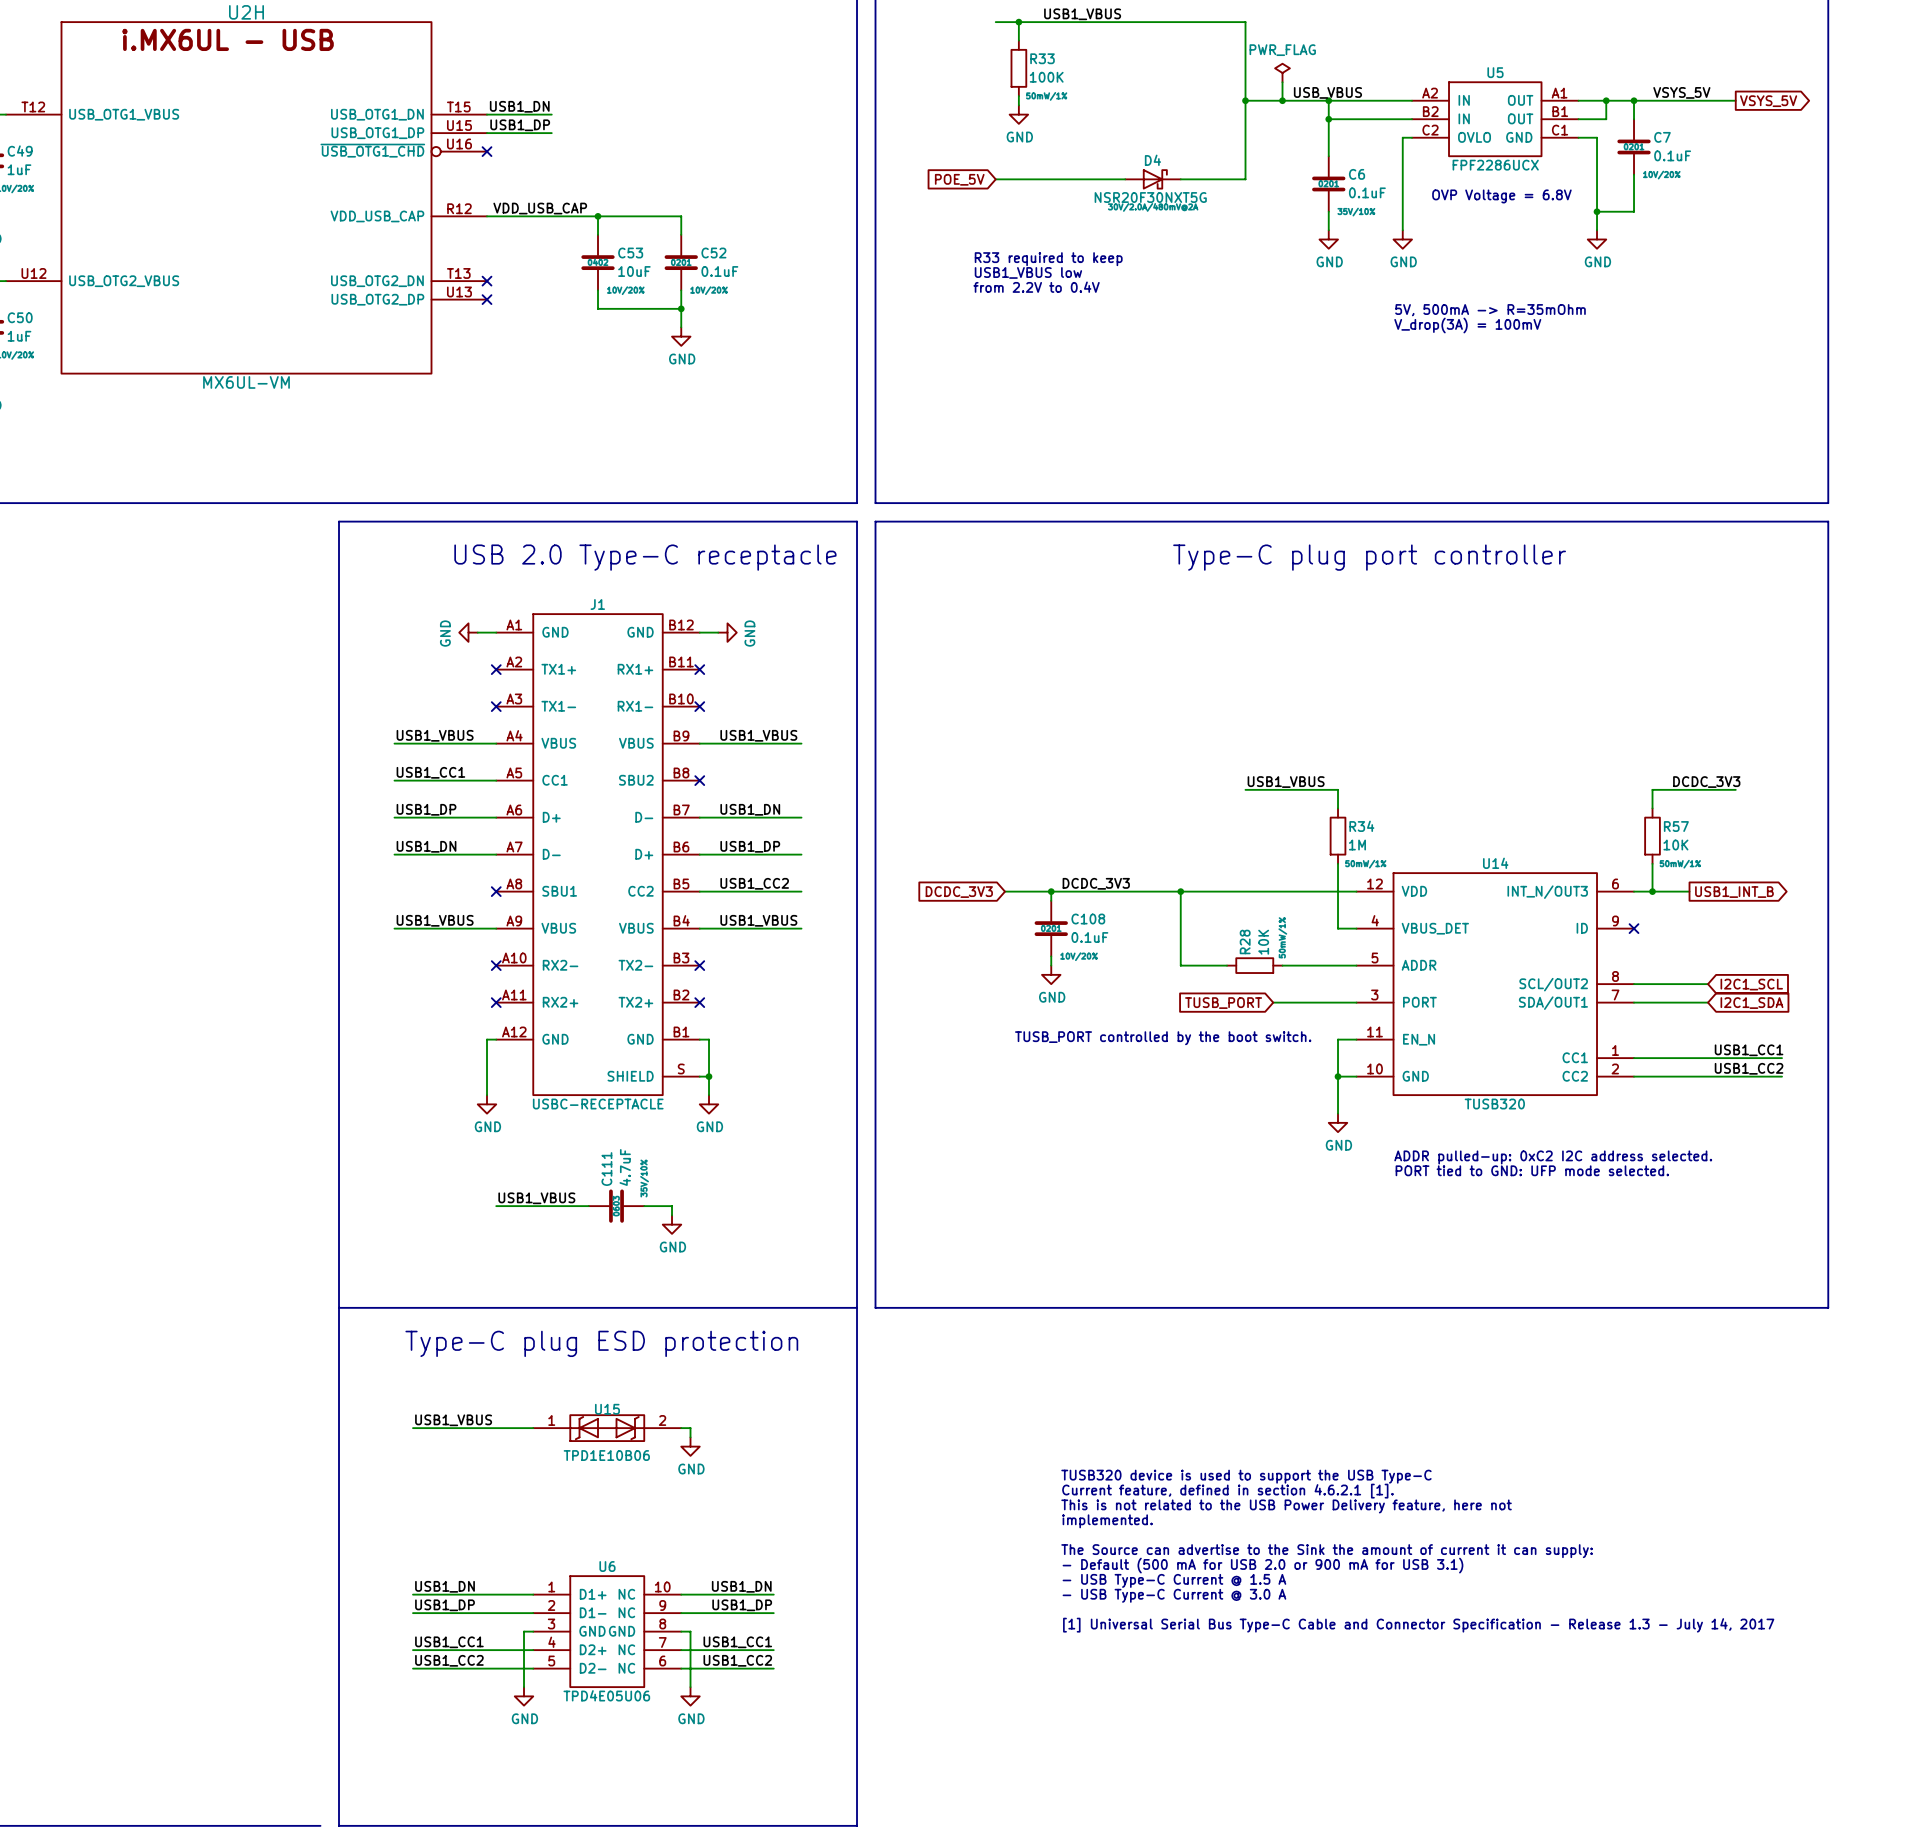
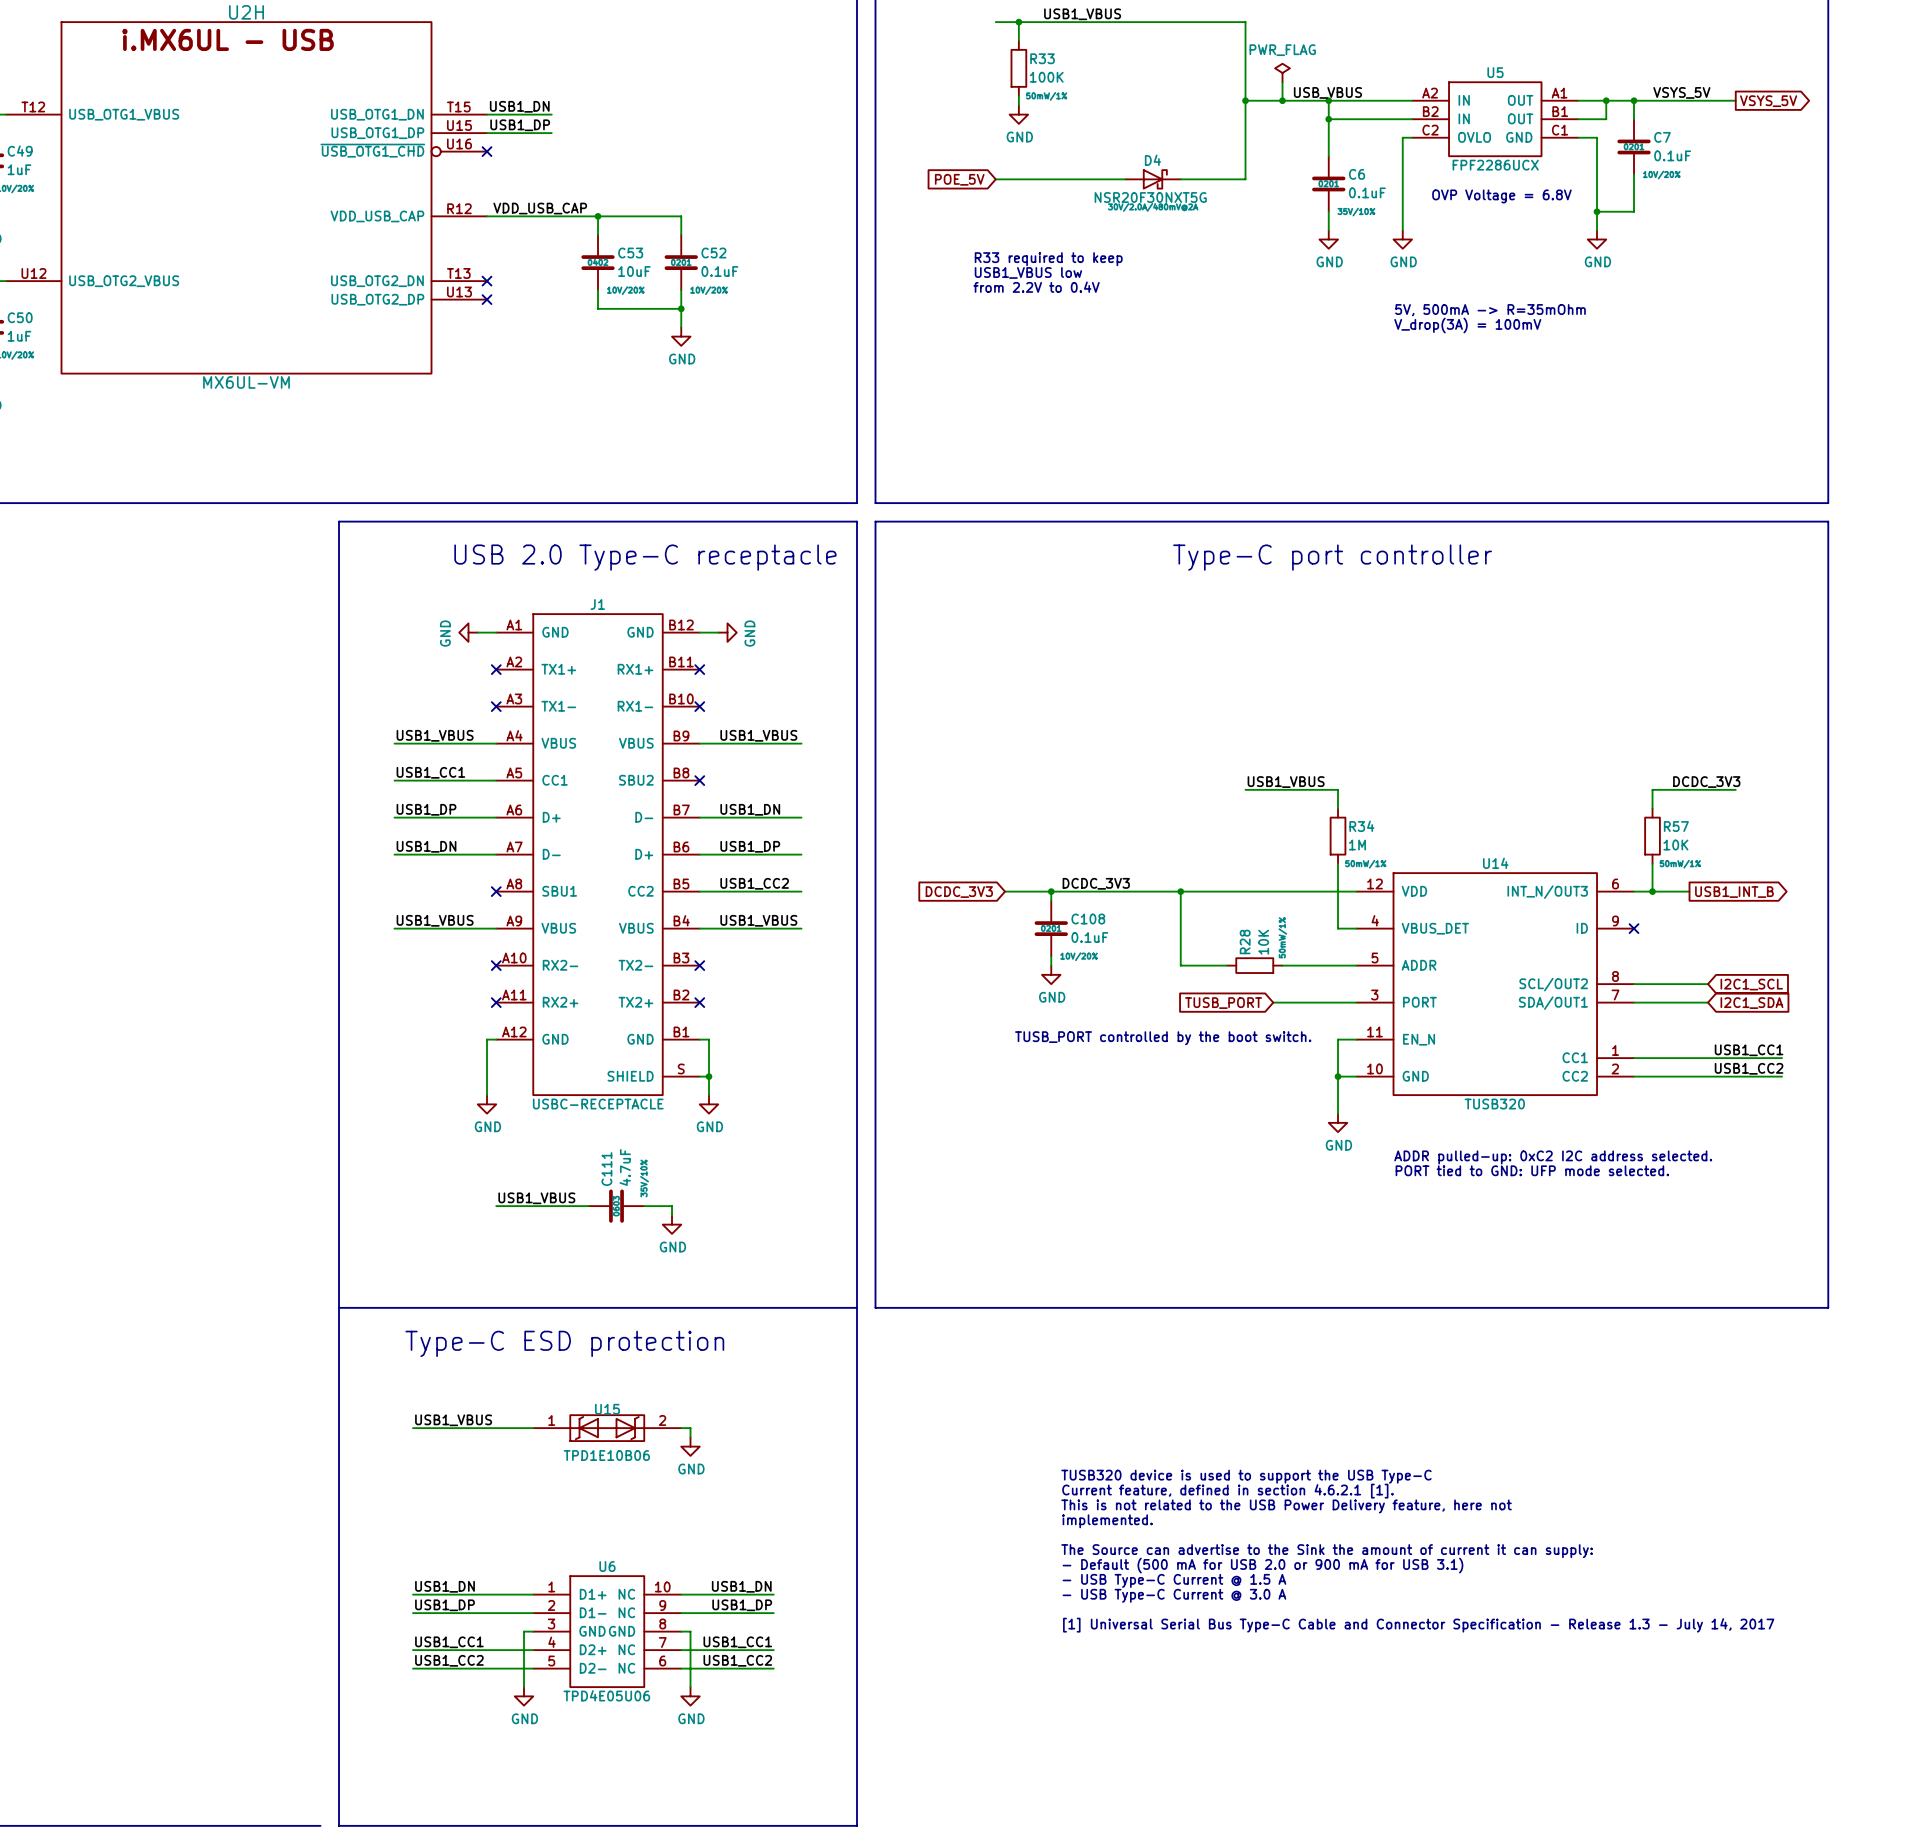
text: Type-C plug port controller (1369, 557) -> Type-C port controller (1332, 557)
text: Type-C plug ESD protection (601, 1343) -> Type-C ESD protection (564, 1343)

